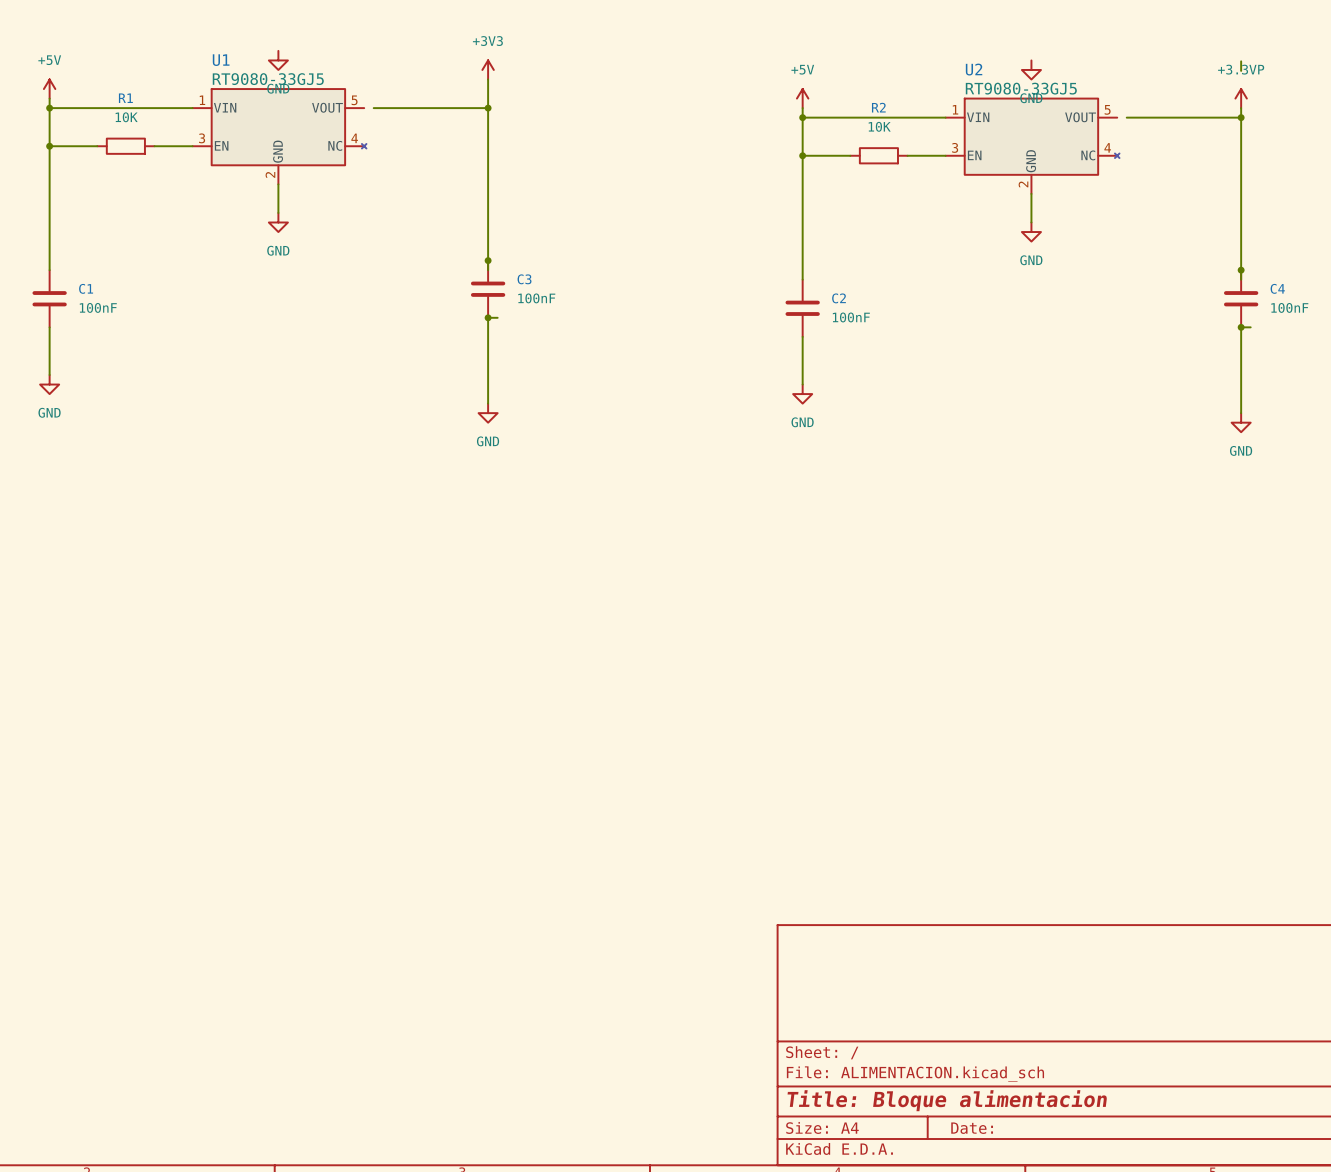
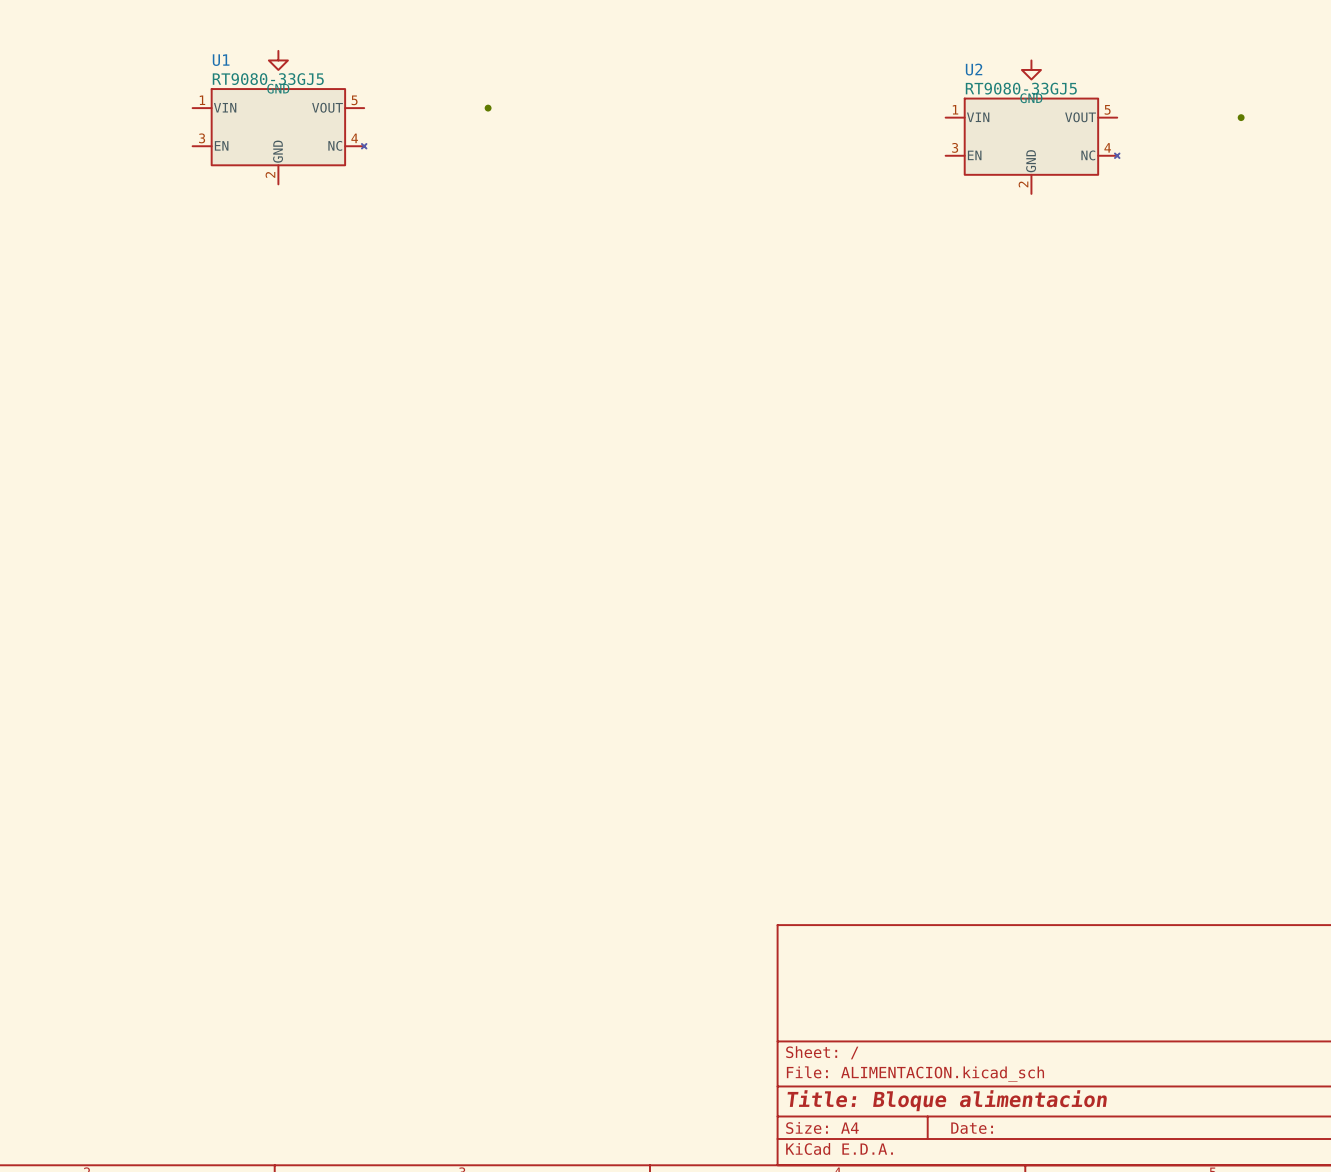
wire: (1241, 61) (1241, 70) -> none
power symbol: +3V3 (488, 69) -> none
wire: (488, 79) (488, 270) -> none
power symbol: +5V (49, 89) -> none
wire: (49, 98) (49, 270) -> none
power symbol: +5V (802, 98) -> none
power symbol: +3.3VP (1241, 98) -> none
wire: (49, 108) (192, 108) -> none
junction: (49, 108) -> none
wire: (373, 108) (488, 108) -> none
wire: (802, 108) (802, 279) -> none
wire: (1241, 108) (1241, 279) -> none
wire: (802, 117) (945, 117) -> none
junction: (802, 117) -> none
wire: (1126, 117) (1241, 117) -> none
wire: (49, 146) (97, 146) -> none
junction: (49, 146) -> none
R1: 10K (125, 146) -> none
wire: (154, 146) (192, 146) -> none
wire: (802, 155) (850, 155) -> none
junction: (802, 155) -> none
R2: 10K (878, 155) -> none
wire: (907, 155) (945, 155) -> none
wire: (278, 184) (278, 212) -> none
wire: (1031, 193) (1031, 222) -> none
power symbol: GND (278, 222) -> none
power symbol: GND (1031, 232) -> none
junction: (488, 260) -> none
junction: (1241, 270) -> none
C3: 100nF (488, 289) -> none
C1: 100nF (49, 298) -> none
C4: 100nF (1241, 298) -> none
C2: 100nF (802, 308) -> none
junction: (488, 317) -> none
wire: (497, 317) (488, 317) (488, 403) -> none
wire: (49, 327) (49, 375) -> none
junction: (1241, 327) -> none
wire: (1250, 327) (1241, 327) (1241, 413) -> none
wire: (802, 336) (802, 384) -> none
power symbol: GND (49, 384) -> none
power symbol: GND (802, 394) -> none
power symbol: GND (488, 413) -> none
power symbol: GND (1241, 422) -> none

